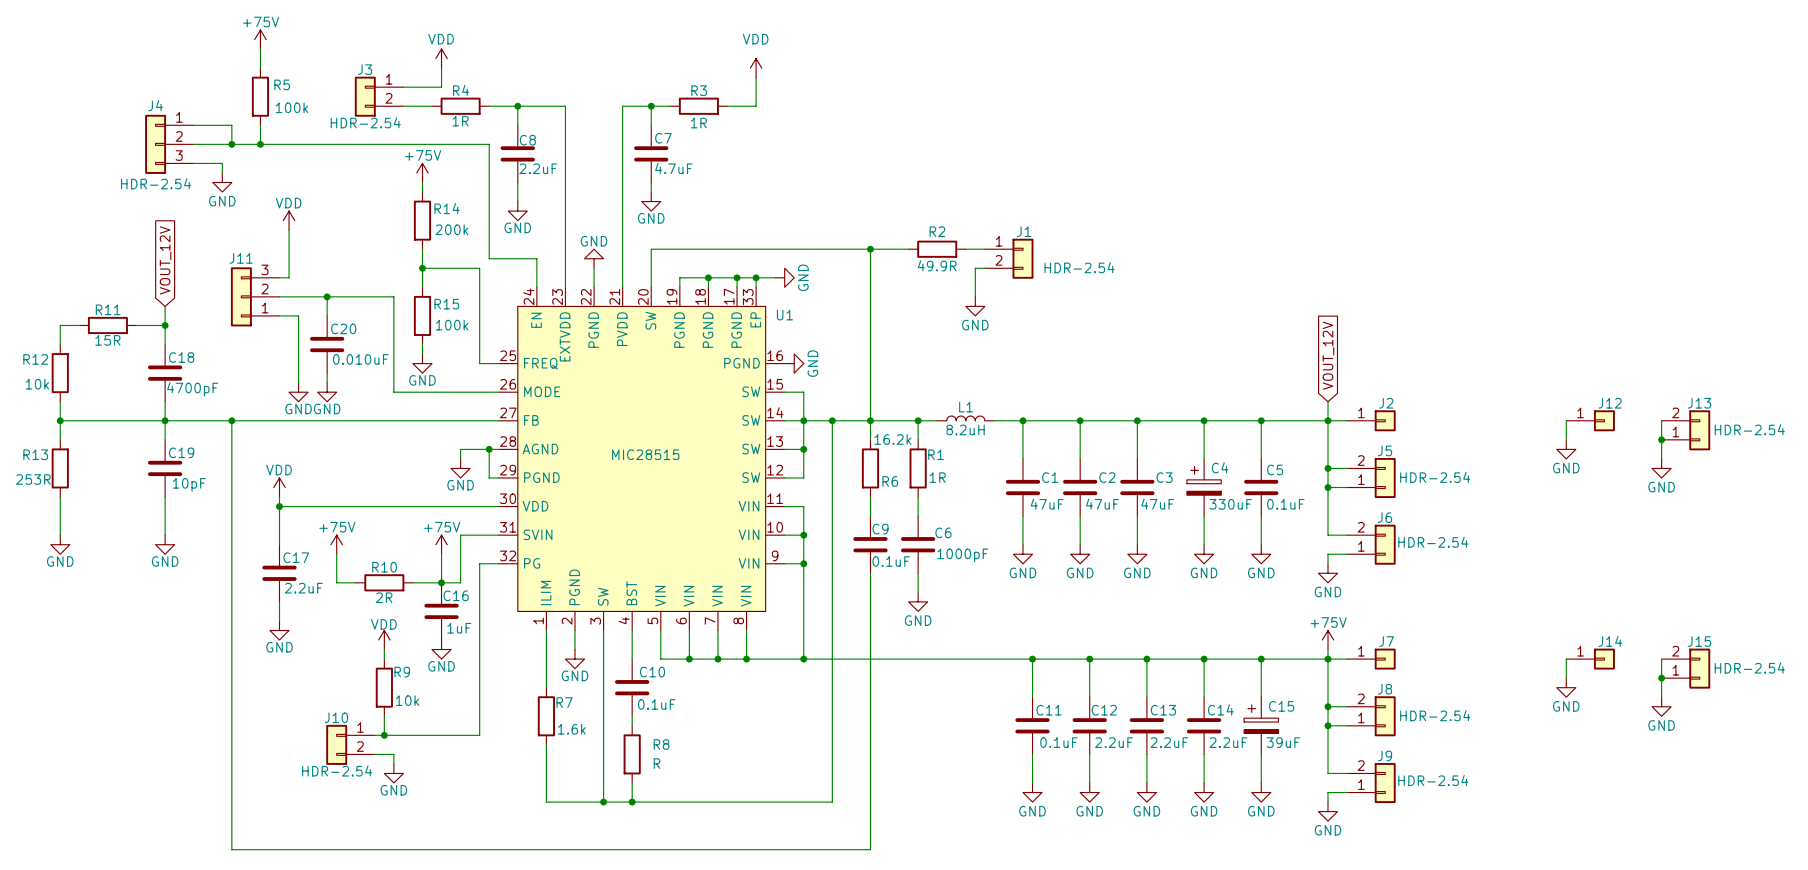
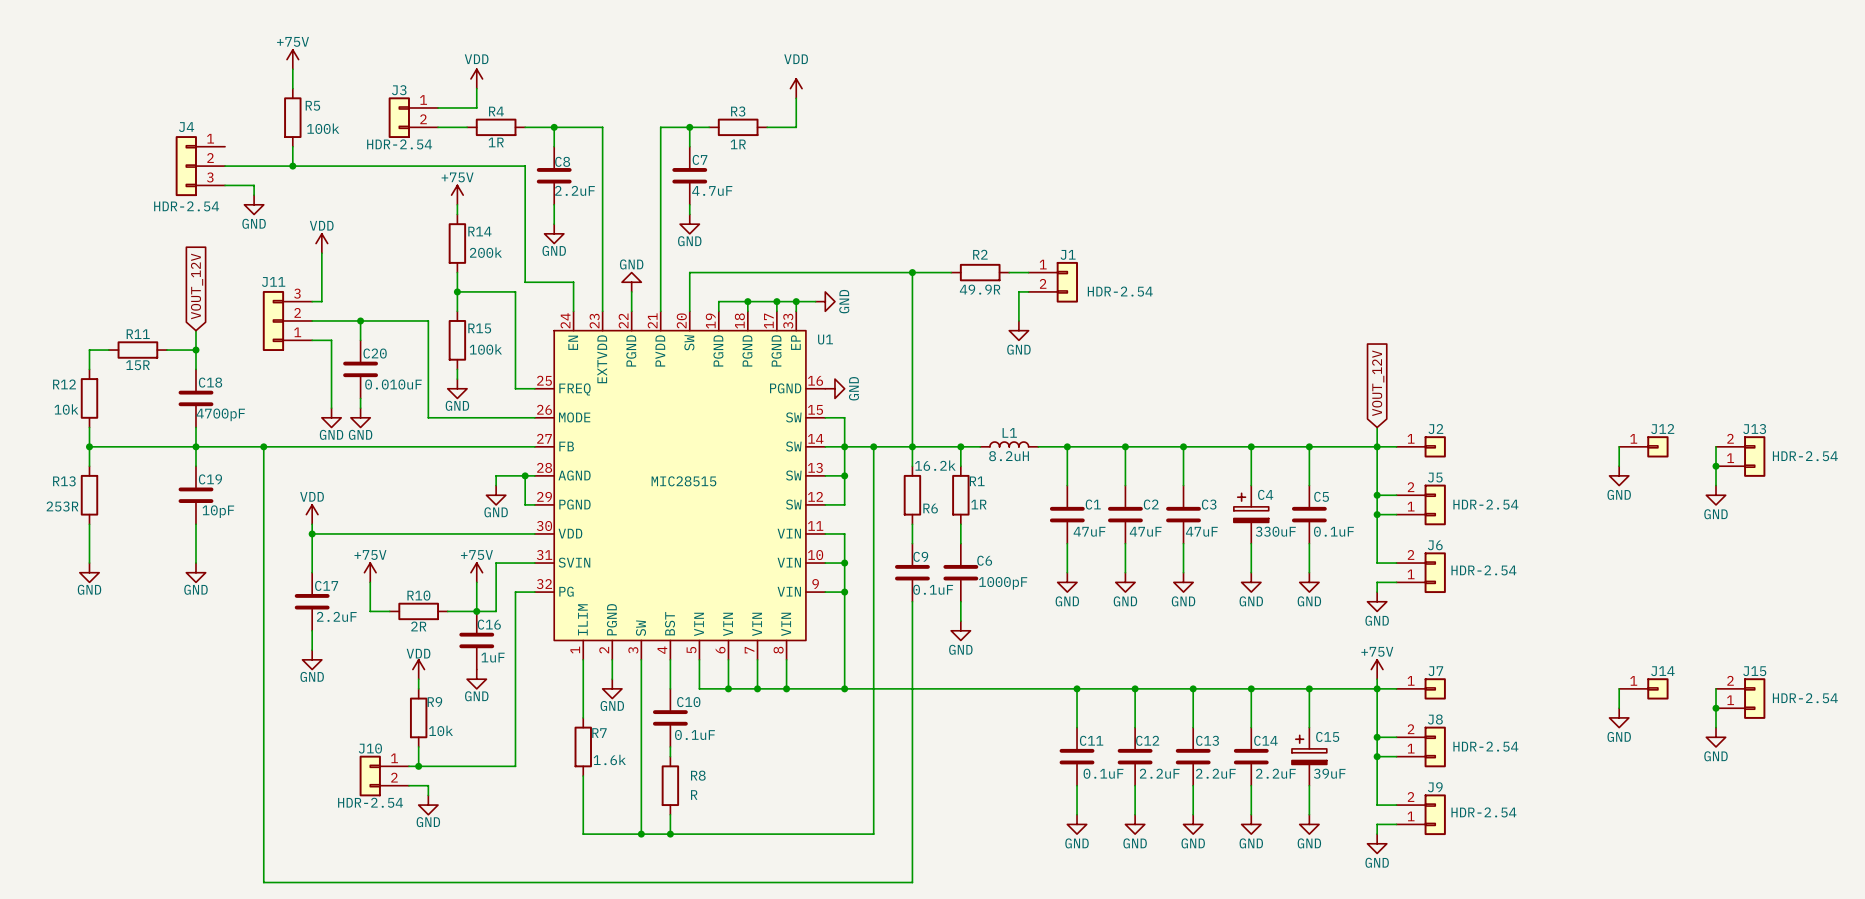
wire: (193, 125) (231, 125) (231, 144) -> none
junction: (231, 144) -> none

